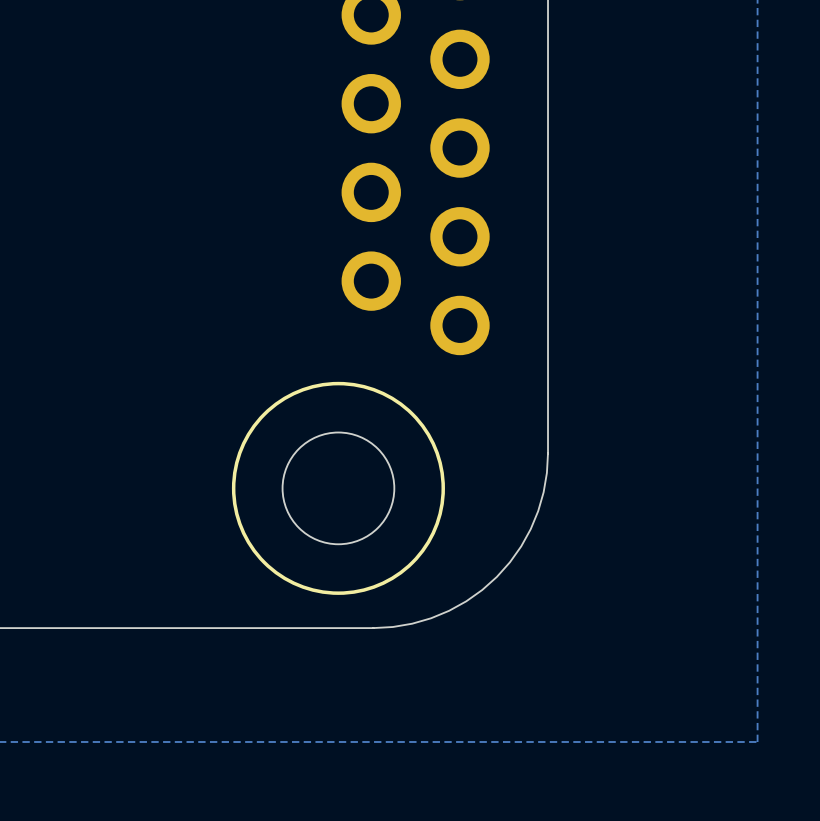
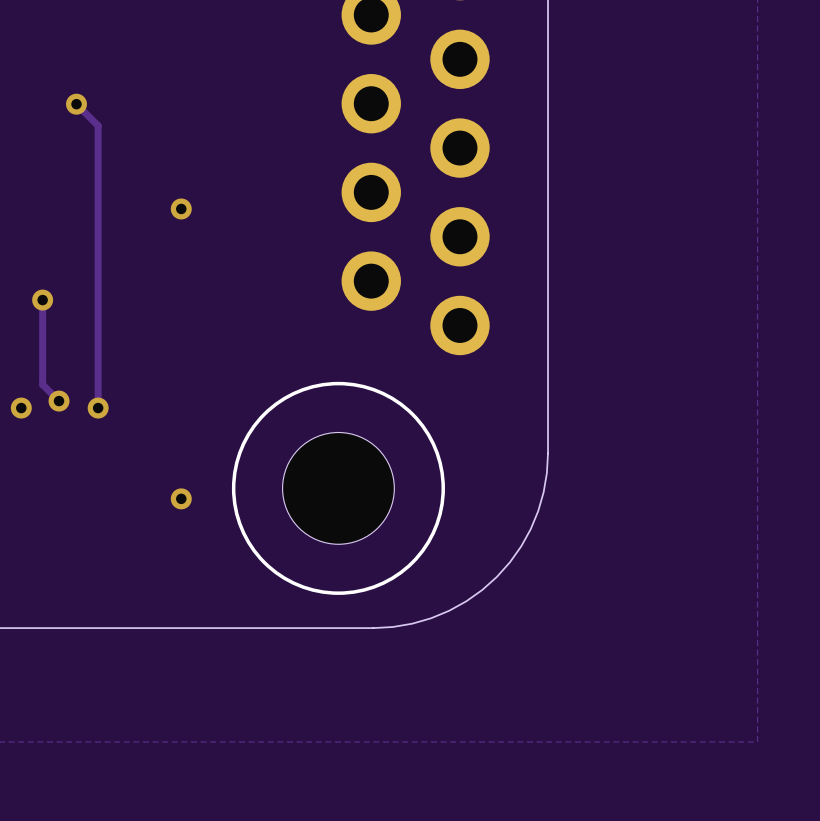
track: none -> (76, 104) (98, 125) (98, 408)
via: none -> (76, 104)
via: none -> (181, 208)
track: none -> (42, 300) (42, 384) (59, 401)
via: none -> (42, 300)
via: none -> (59, 401)
via: none -> (21, 408)
via: none -> (98, 408)
via: none -> (181, 498)

